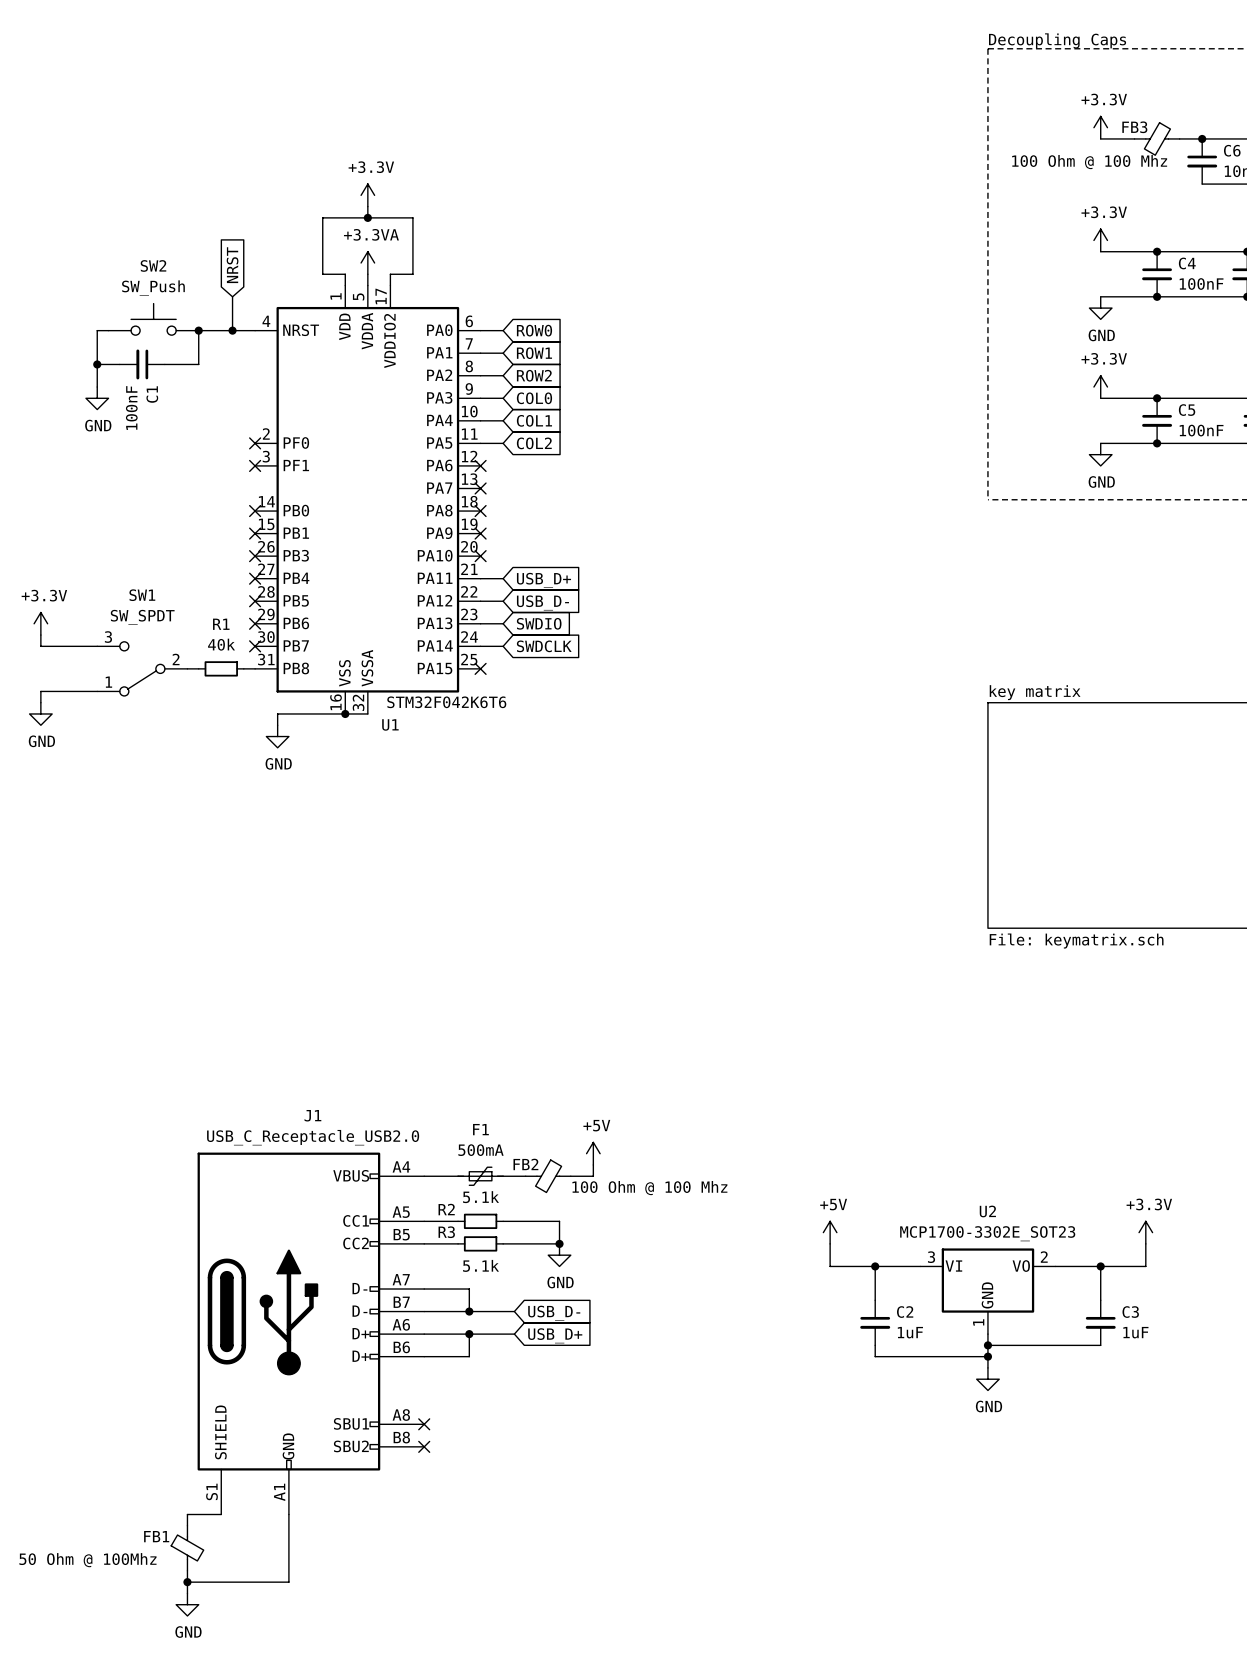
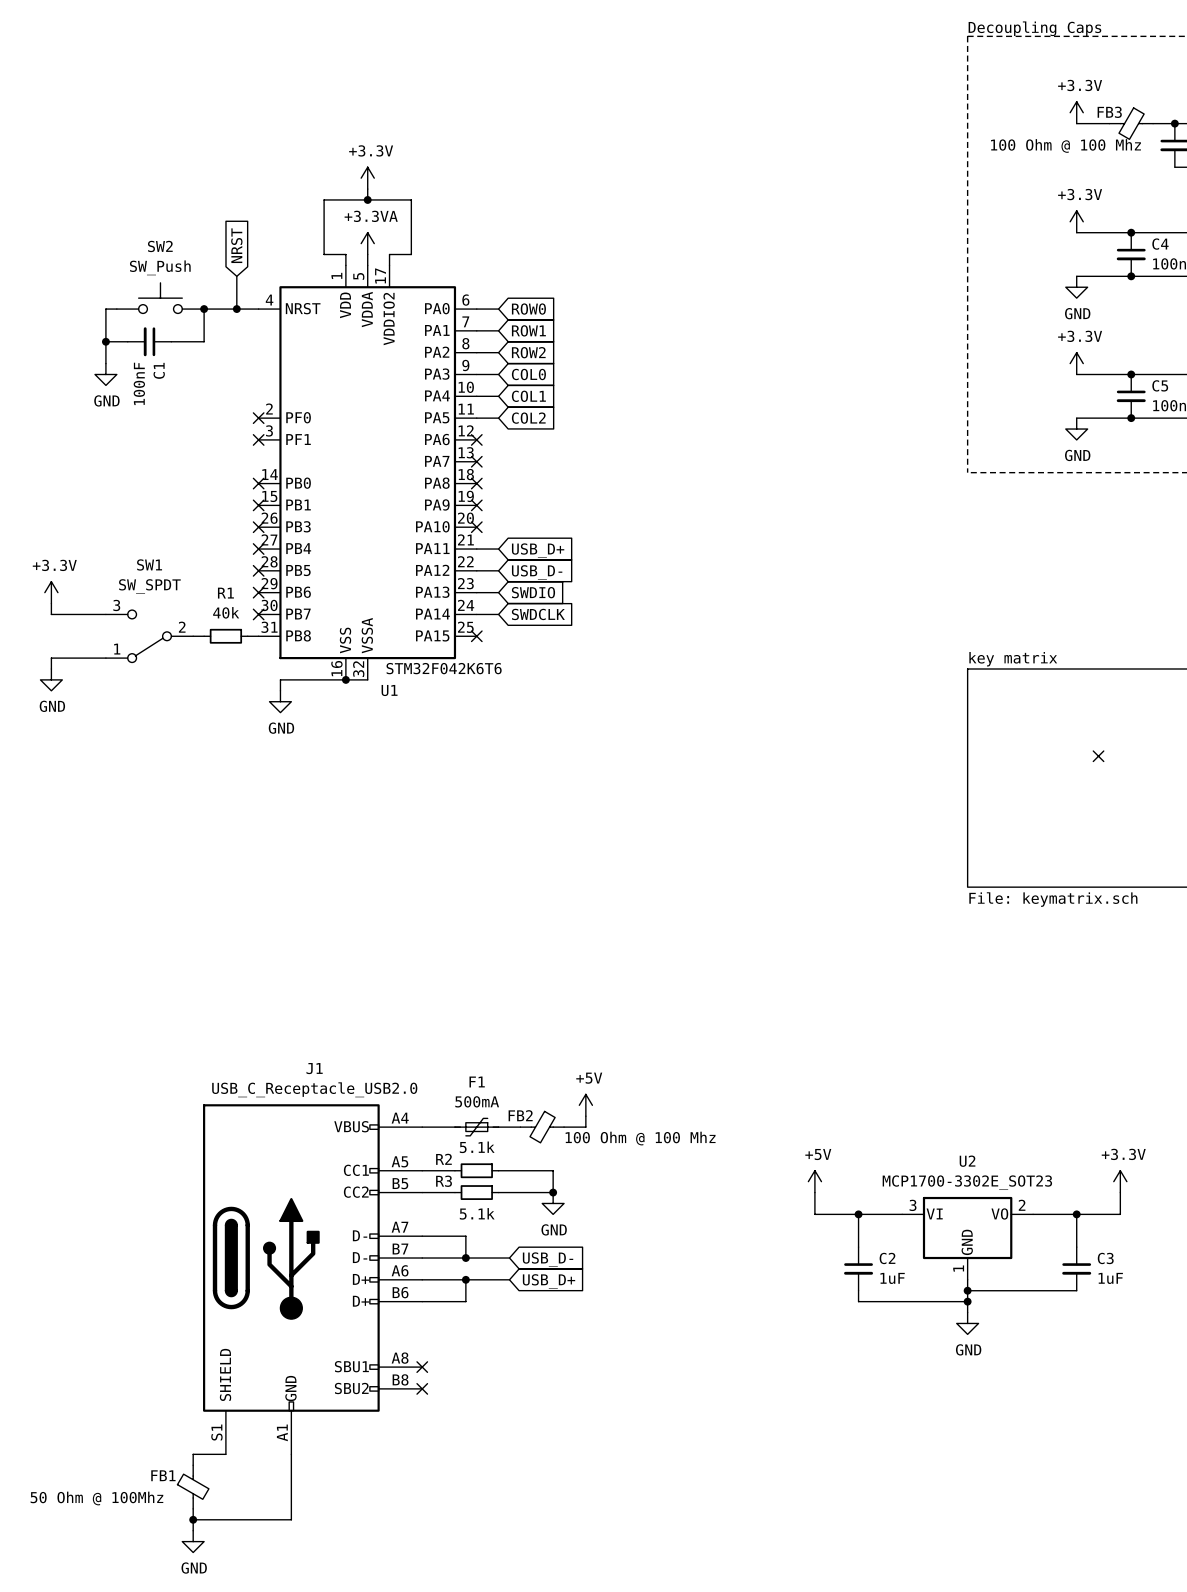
no-connect mark: none -> (1098, 756)

